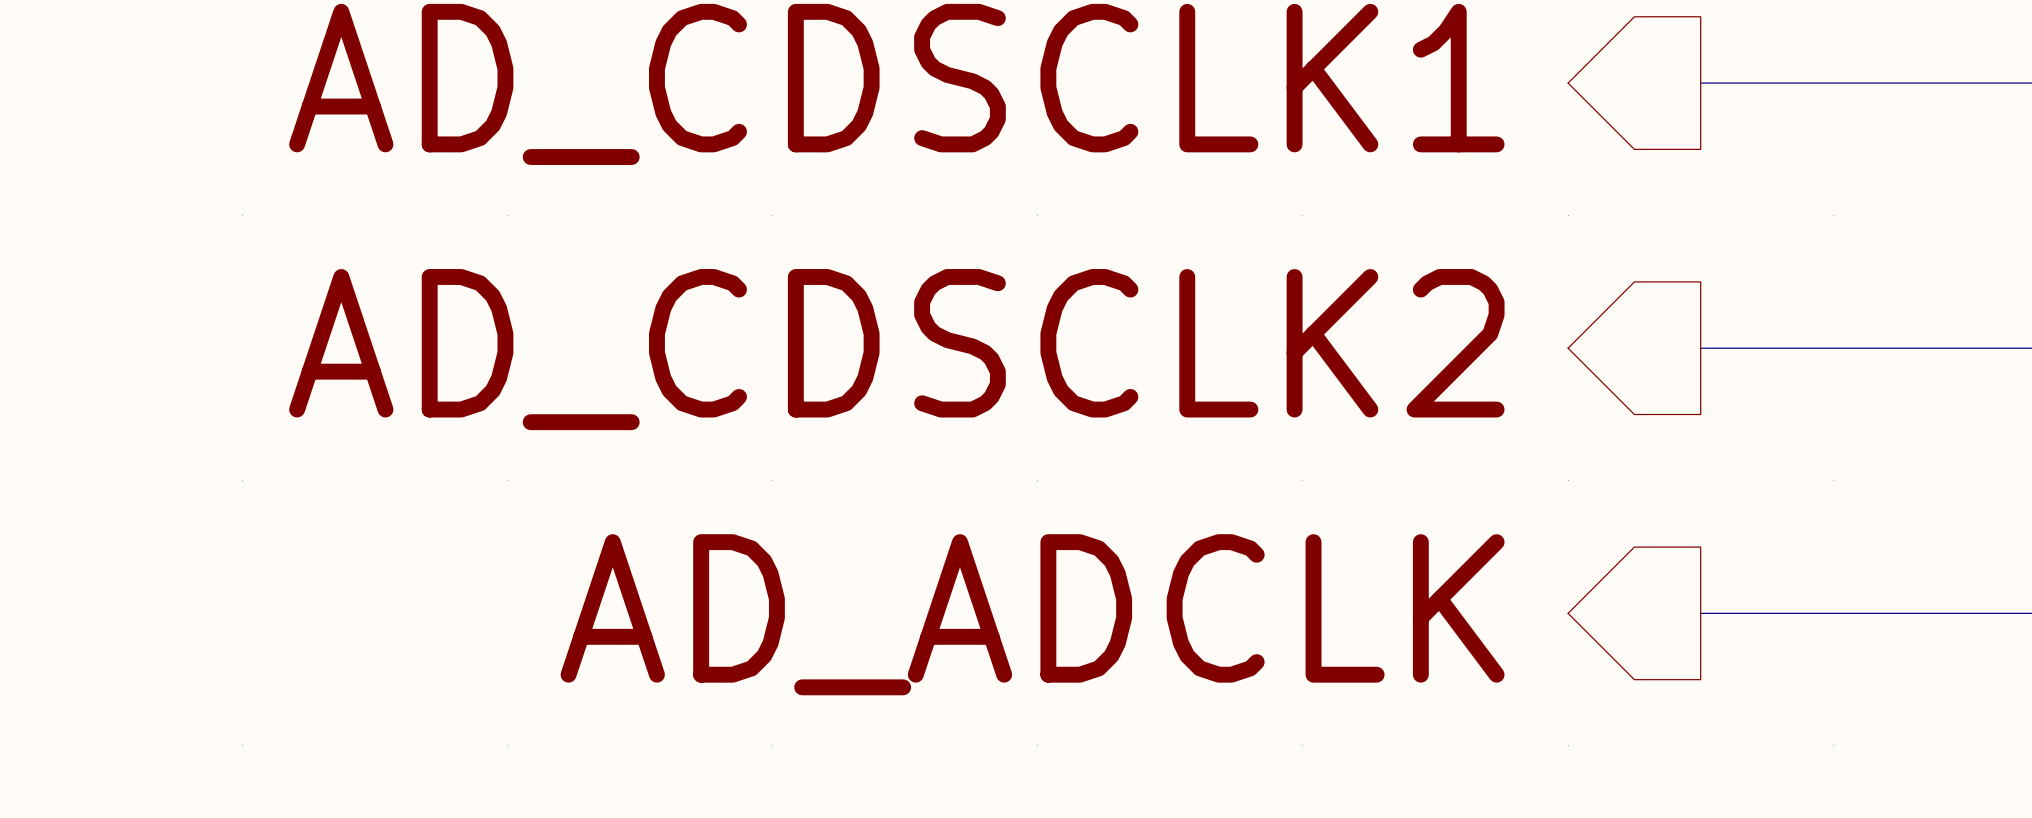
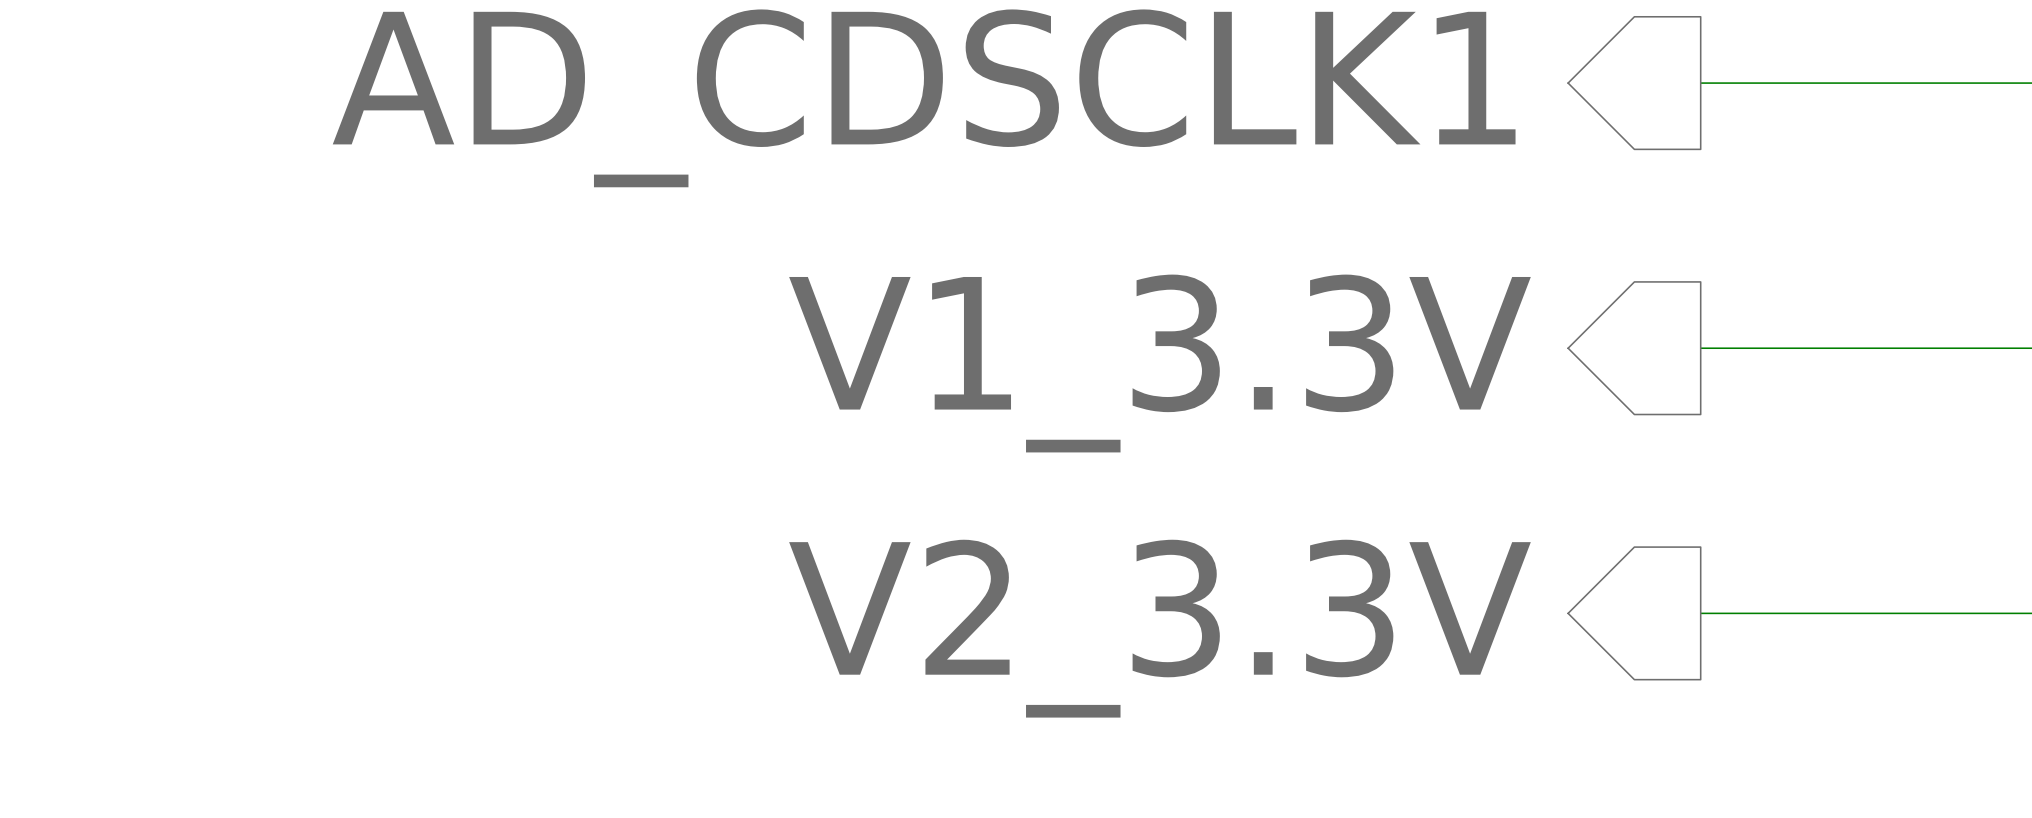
hierarchical label: AD_CDSCLK2 (896, 349) -> V1_3.3V (1159, 363)
hierarchical label: AD_ADCLK (1032, 614) -> V2_3.3V (1159, 628)

